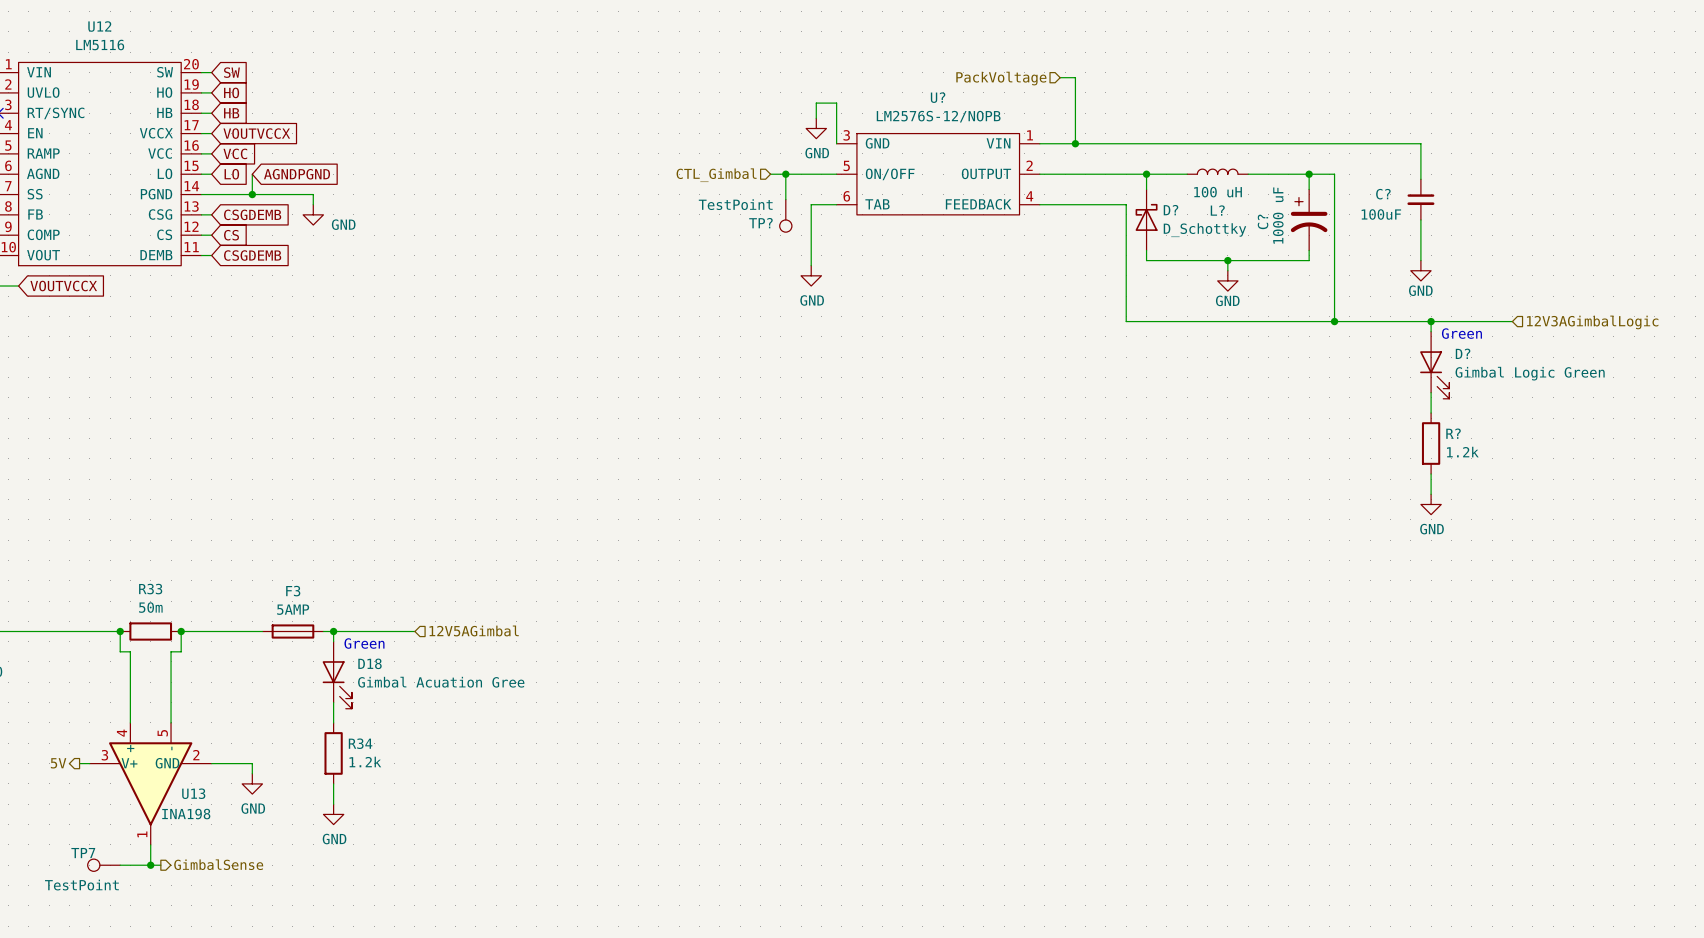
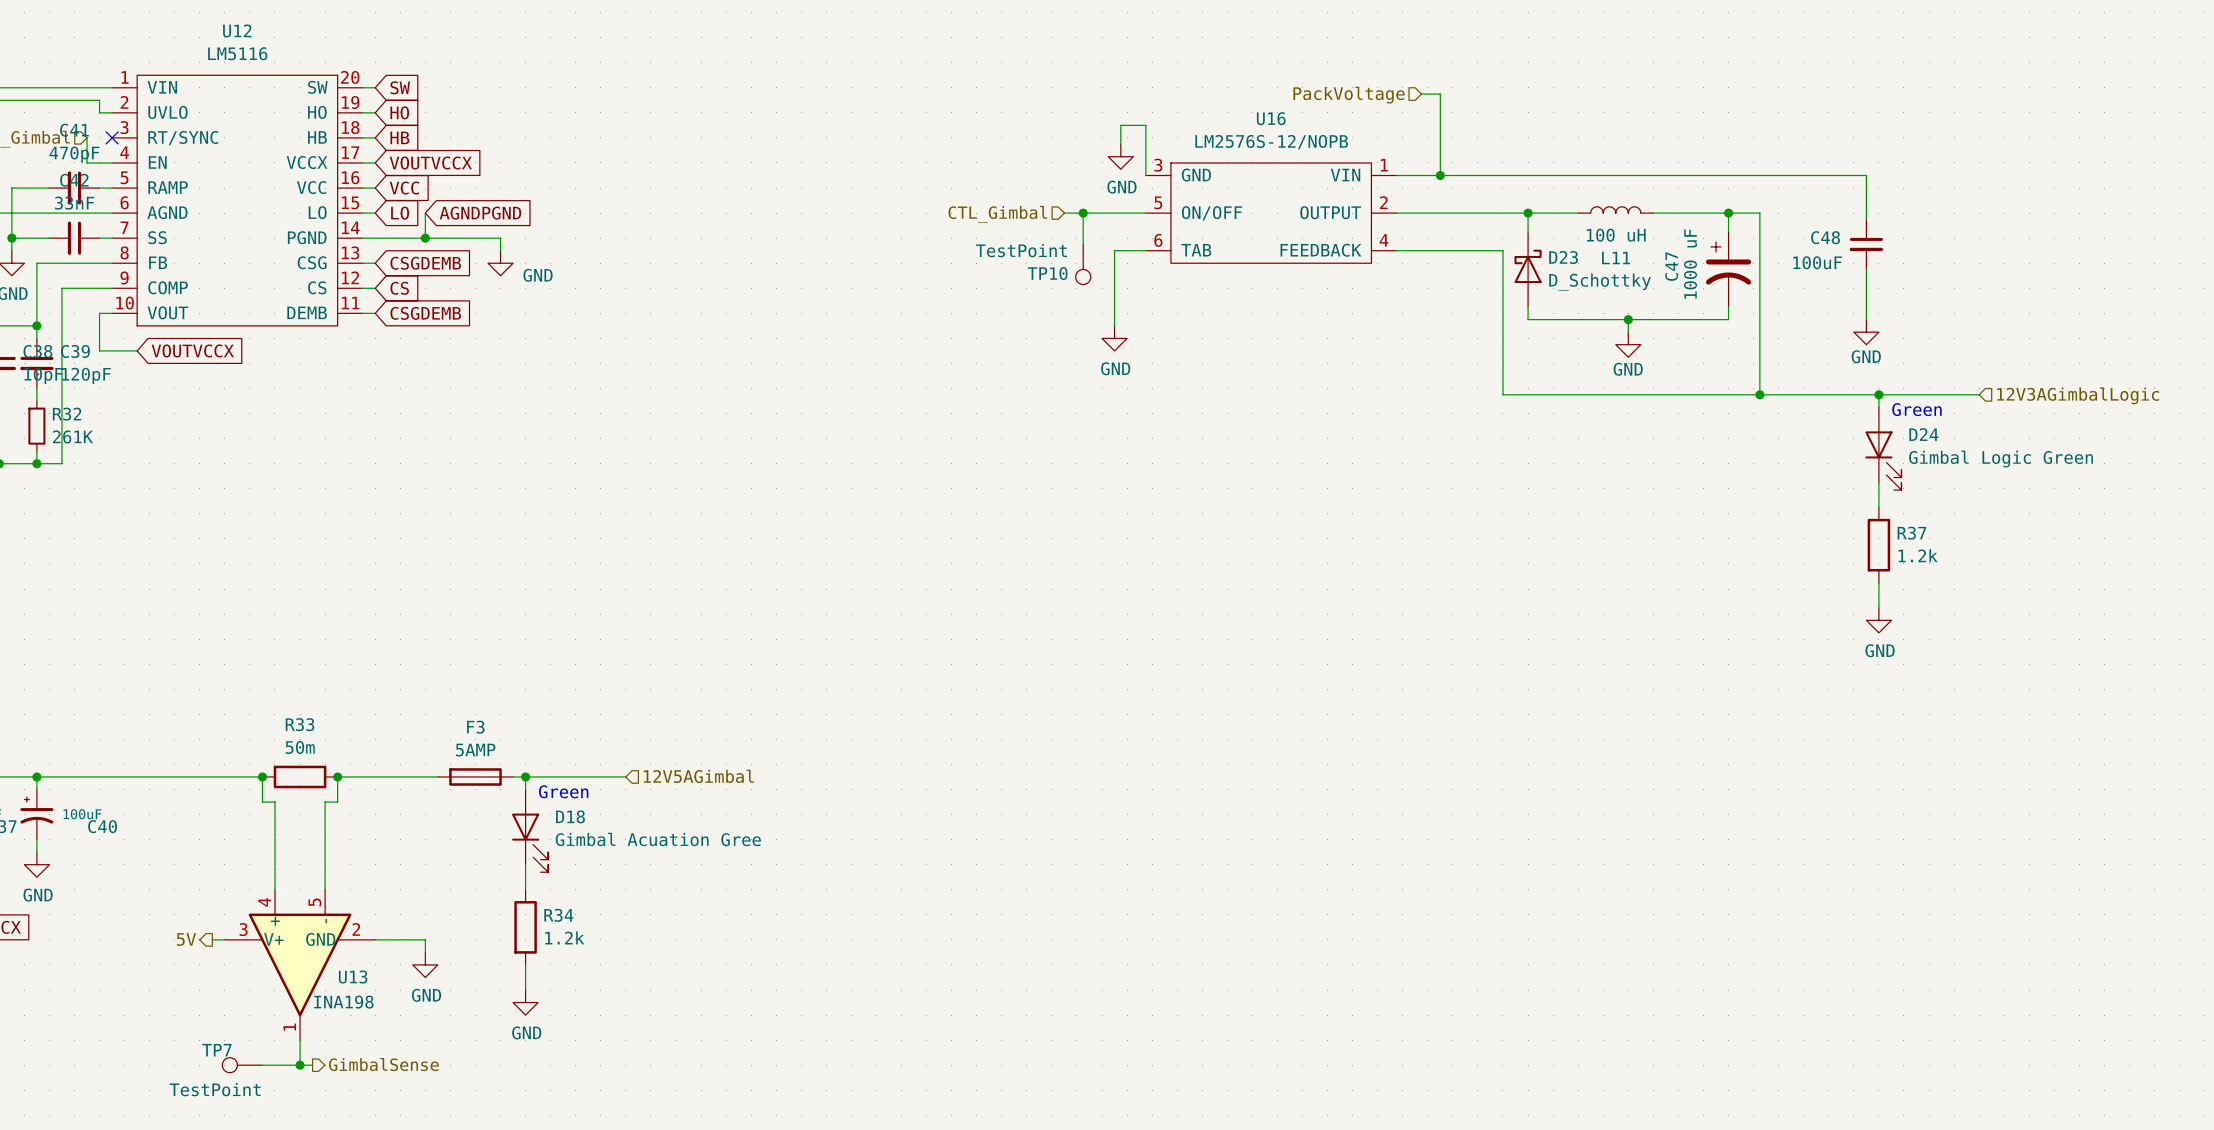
U? name: U? (938, 97) -> U16 (1271, 118)
C? name: C? (1383, 194) -> C48 (1825, 237)
D? name: D? (1171, 210) -> D23 (1563, 257)
L? name: L? (1217, 210) -> L11 (1616, 257)
C? name: C? (1263, 221) -> C47 (1671, 266)
TP? name: TP? (760, 223) -> TP10 (1047, 273)
D? name: D? (1463, 353) -> D24 (1923, 434)
R? name: R? (1453, 433) -> R37 (1911, 533)

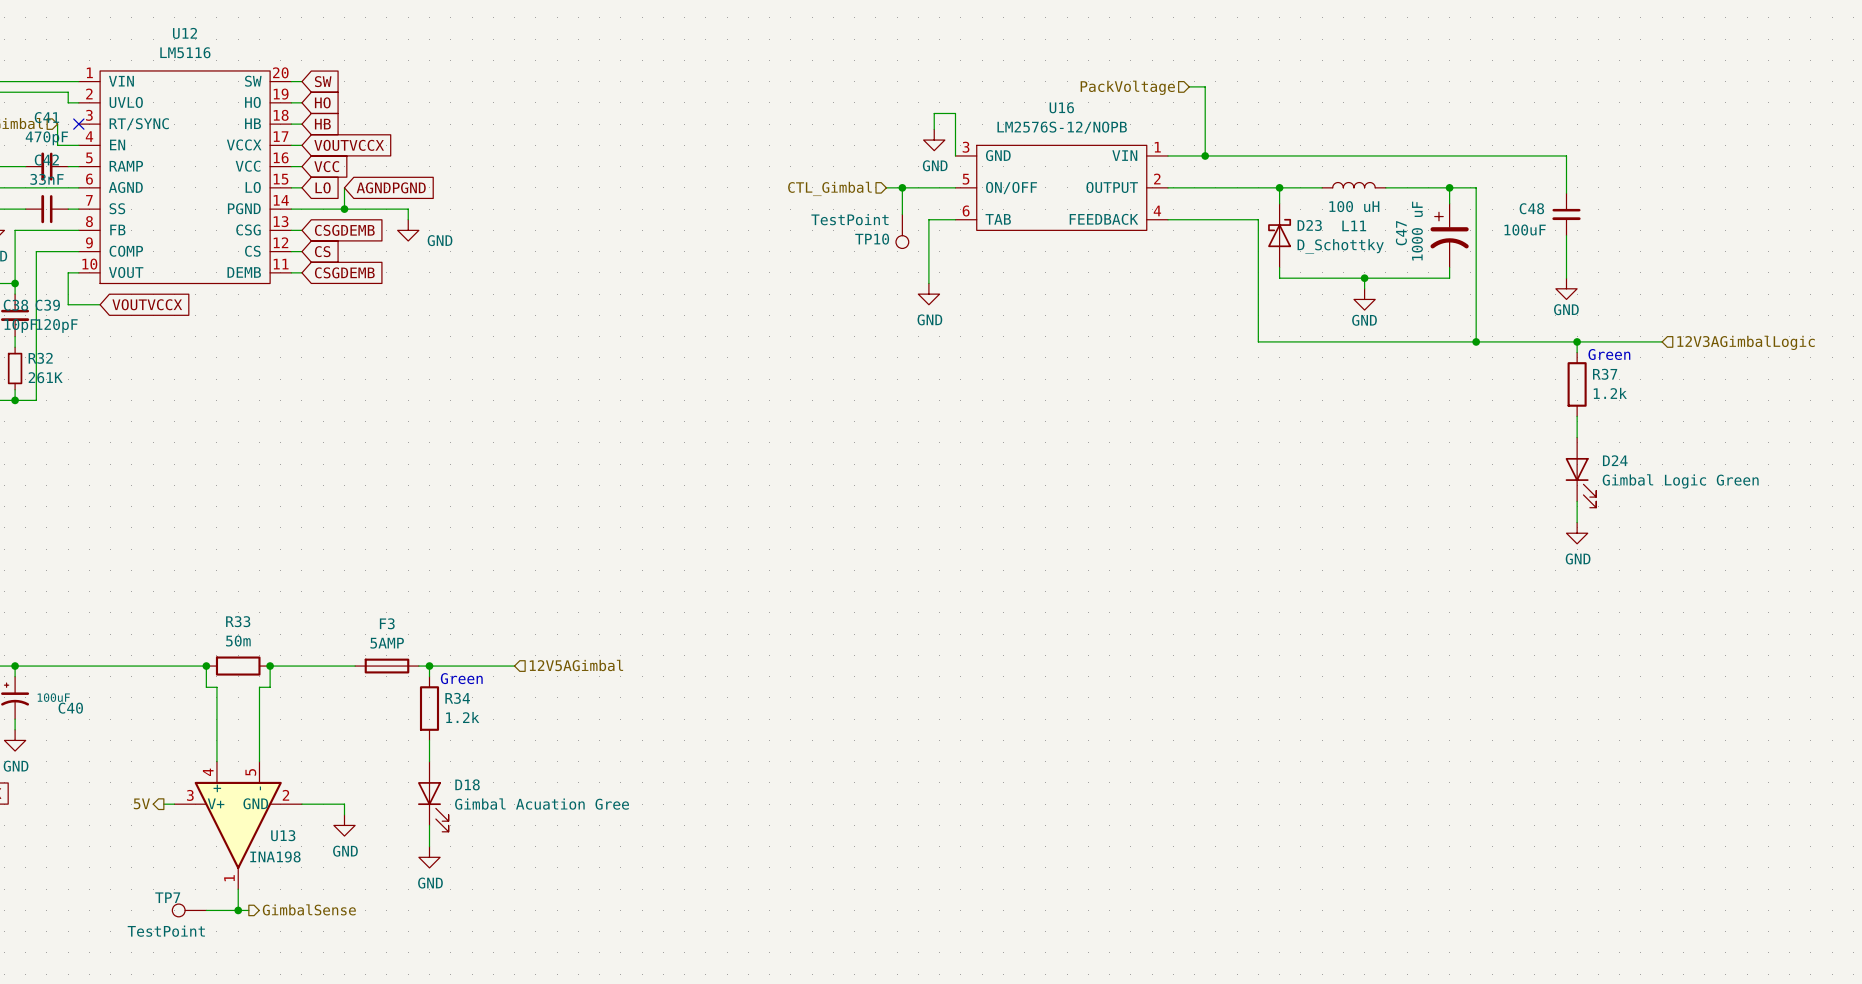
D24 position: (1883, 448) -> (1580, 472)
R37 position: (1878, 545) -> (1577, 384)
D18 position: (530, 830) -> (433, 796)
R34 position: (525, 927) -> (429, 708)

